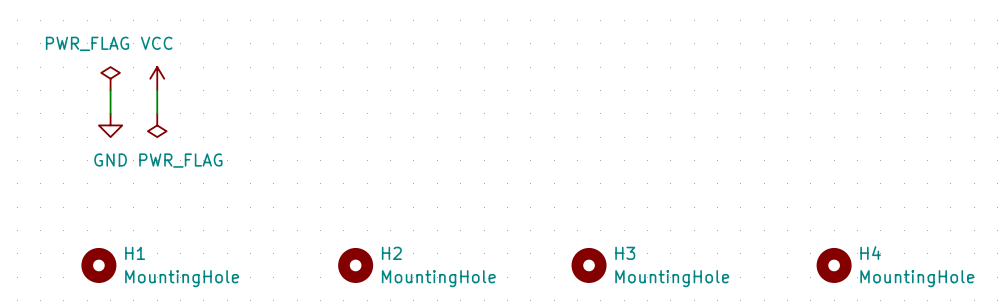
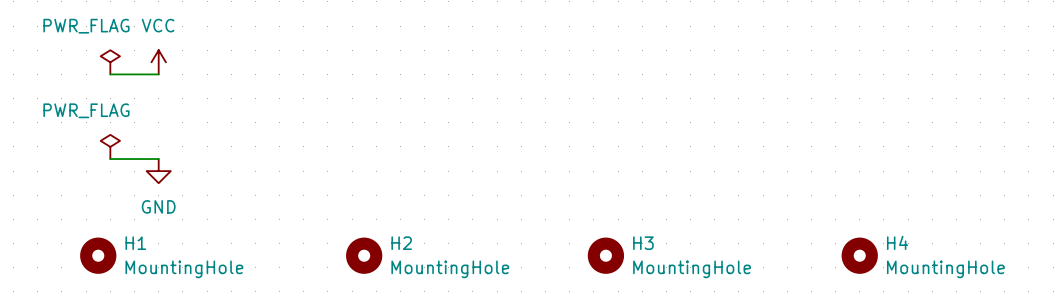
wire: (110, 90) (110, 113) -> (110, 74) (158, 74)
wire: (157, 90) (157, 113) -> none
power symbol position: GND (110, 125) -> GND (158, 171)
power symbol rotation: 0° (157, 125) -> 180° (110, 146)
power symbol position: PWR_FLAG (157, 125) -> PWR_FLAG (110, 146)
wire: none -> (110, 159) (158, 159)

